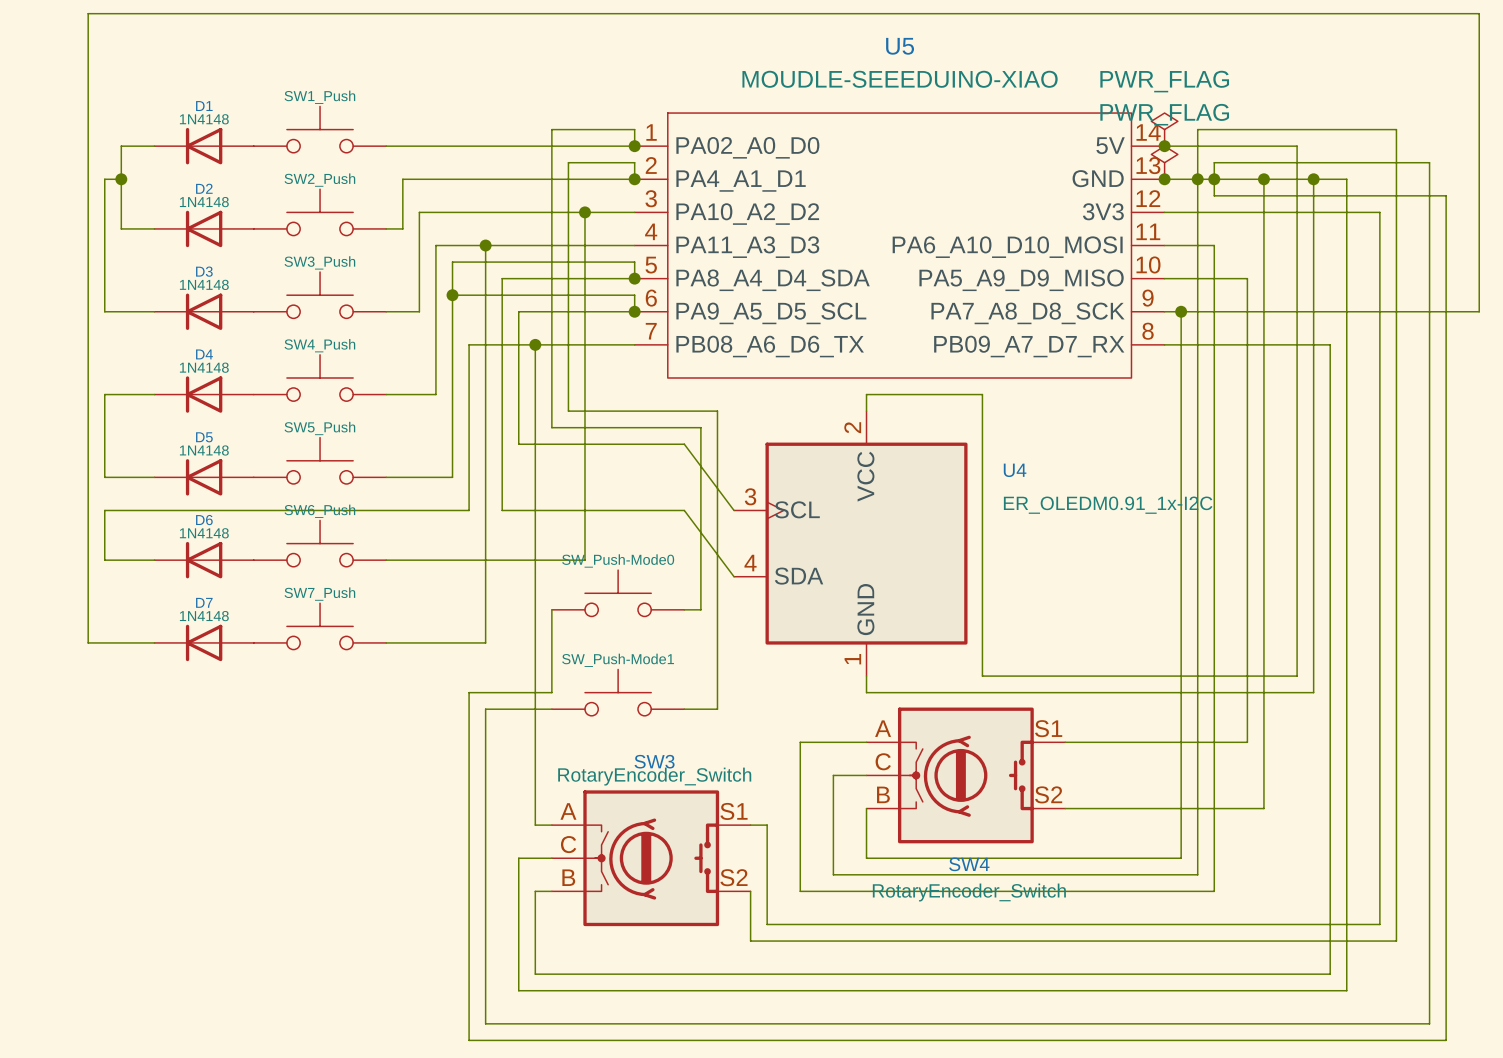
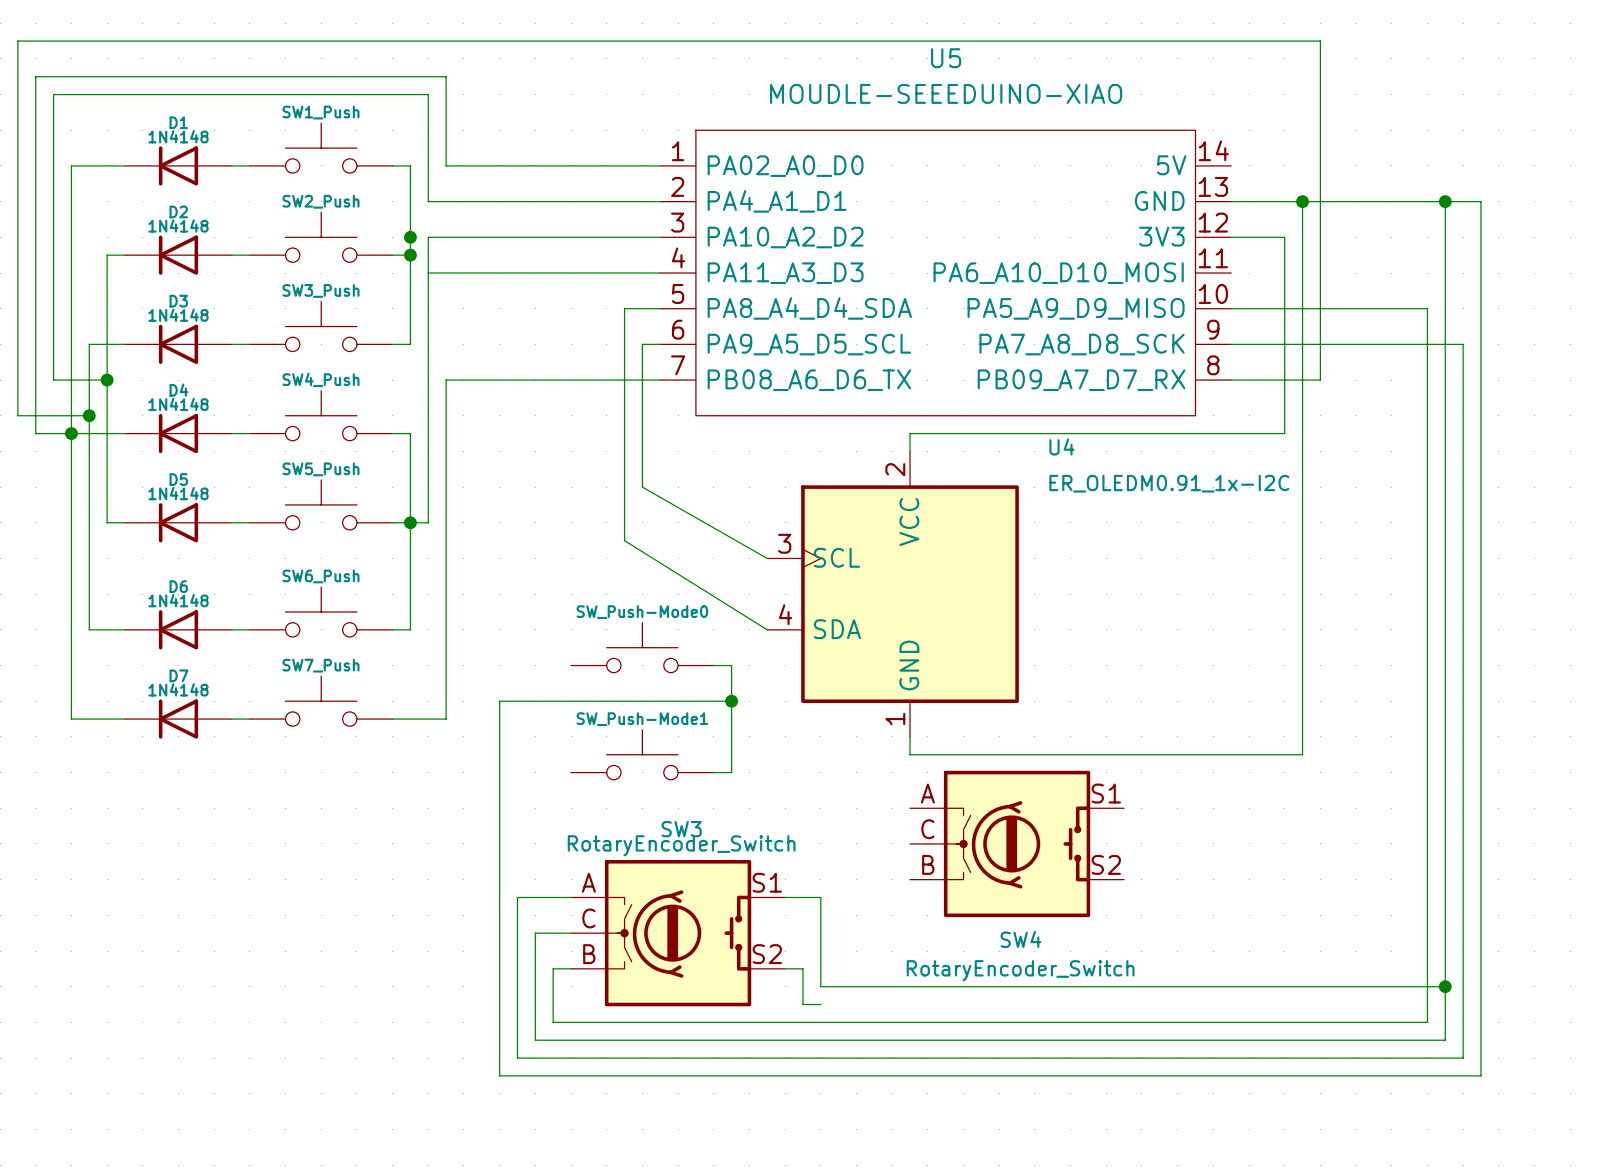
power symbol: PWR_FLAG (1164, 129) -> none
wire: (88, 146) (88, 13) (1479, 13) (1479, 311) (1379, 311) (1379, 212) (1214, 212) -> none
wire: (121, 146) (121, 228) -> (107, 165) (71, 165)
D1 position: (204, 146) -> (178, 165)
wire: (402, 146) (435, 146) -> none
wire: (634, 146) (634, 129) (551, 129) (551, 427) (700, 427) (700, 609) -> none
junction: (634, 146) -> none
wire: (1164, 146) (1297, 146) (1297, 676) (982, 676) (982, 394) -> (1284, 433) (1034, 433)
junction: (1164, 146) -> none
power symbol: PWR_FLAG (1164, 162) -> none
wire: (121, 179) (104, 179) (104, 311) -> (446, 165) (446, 76) (35, 76) (35, 433) (89, 433) (89, 344)
junction: (121, 179) -> none
wire: (402, 179) (419, 179) -> (410, 201) (410, 165)
wire: none -> (428, 201) (428, 94) (53, 94) (53, 380) (107, 380)
wire: (634, 179) (634, 162) (568, 162) (568, 411) (717, 411) (717, 709) (700, 709) -> (731, 665) (731, 772)
junction: (634, 179) -> none
junction: (1164, 179) -> none
junction: (1197, 179) -> none
junction: (1214, 179) -> none
junction: none -> (1302, 201)
wire: (1263, 179) (1263, 808) (1065, 808) -> none
junction: (1263, 179) -> none
wire: (1313, 179) (1313, 692) (1230, 692) -> (1302, 201) (1302, 754)
junction: (1313, 179) -> none
wire: (1346, 179) (1346, 278) -> (1427, 201) (1480, 201)
wire: none -> (1445, 201) (1445, 1040) (535, 1040)
junction: none -> (1445, 201)
wire: (1396, 179) (1396, 129) (1197, 129) (1197, 874) (833, 874) (833, 775) (866, 775) -> none
junction: none -> (410, 237)
wire: (584, 212) (584, 560) (386, 560) -> none
junction: (584, 212) -> none
wire: none -> (107, 255) (107, 522)
D2 position: (204, 228) -> (178, 255)
junction: none -> (410, 255)
wire: (435, 245) (435, 344) -> (446, 273) (428, 273)
wire: (485, 245) (485, 642) (386, 642) -> none
junction: (485, 245) -> none
wire: (1164, 245) (1214, 245) -> (1284, 237) (1284, 273)
wire: (601, 278) (502, 278) (502, 510) (684, 510) (734, 576) -> (624, 308) (624, 540) (767, 629)
wire: (634, 278) (634, 262) (452, 262) (452, 477) (419, 477) -> (428, 344) (428, 522)
junction: (634, 278) -> none
wire: none -> (1427, 308) (1320, 308) (1320, 41) (17, 41) (17, 415) (89, 415)
wire: (452, 295) (634, 295) (634, 311) -> none
junction: (452, 295) -> none
D3 position: (204, 311) -> (178, 344)
wire: (402, 311) (419, 311) -> (410, 344) (410, 255)
wire: (618, 311) (518, 311) (518, 444) (684, 444) (734, 510) -> (642, 344) (642, 487) (767, 558)
junction: (634, 311) -> none
wire: (1181, 311) (1181, 858) (866, 858) (866, 808) -> none
junction: (1181, 311) -> none
junction: none -> (107, 380)
wire: (469, 344) (469, 510) (104, 510) -> (481, 380) (446, 380)
wire: (535, 344) (535, 825) -> none
junction: (535, 344) -> none
junction: none -> (89, 415)
junction: none -> (71, 433)
D4 position: (204, 394) -> (178, 433)
wire: (402, 394) (435, 394) -> (410, 433) (410, 629) (392, 629)
wire: none -> (446, 433) (446, 719) (392, 719)
wire: (1214, 394) (1214, 891) (800, 891) (800, 742) (866, 742) -> none
U4 name position: U4 (1015, 470) -> U4 (1061, 446)
wire: (104, 477) (121, 477) -> (89, 522) (89, 558)
D5 position: (204, 477) -> (178, 522)
junction: none -> (410, 522)
U4 value position: ER_OLEDM0.91_1x-I2C (1108, 505) -> ER_OLEDM0.91_1x-I2C (1169, 483)
part position: (320, 543) -> (321, 612)
wire: (104, 560) (154, 560) -> (89, 612) (89, 629) (124, 629)
D6 position: (204, 560) -> (178, 629)
wire: none -> (232, 629) (249, 629)
wire: (551, 609) (551, 692) (469, 692) (469, 1040) (1446, 1040) (1446, 195) (1214, 195) (1214, 162) (1429, 162) (1429, 1023) (485, 1023) (485, 990) -> none
part position: (320, 626) -> (321, 701)
wire: (88, 642) (154, 642) -> (71, 701) (71, 719) (124, 719)
D7 position: (204, 642) -> (178, 719)
junction: none -> (731, 701)
wire: none -> (232, 719) (249, 719)
wire: (485, 709) (551, 709) -> (499, 772) (499, 701) (731, 701)
wire: (1065, 742) (1247, 742) (1247, 344) (1330, 344) (1330, 974) -> (1463, 1004) (1463, 1058) (1409, 1058)
wire: (767, 825) (767, 891) -> (802, 897) (820, 897) (820, 986) (1445, 986)
wire: (750, 891) (750, 941) -> (785, 968) (802, 968)
junction: none -> (1445, 986)
wire: (783, 924) (1379, 924) -> none
wire: (535, 941) (535, 974) -> (553, 897) (517, 897) (517, 1058) (553, 1058)
wire: none -> (553, 1022) (785, 1022)
wire: (1396, 941) (1346, 941) (1346, 990) -> (1480, 1022) (1480, 1075) (1427, 1075)
wire: (518, 957) (518, 990) -> (499, 1075) (535, 1075)

